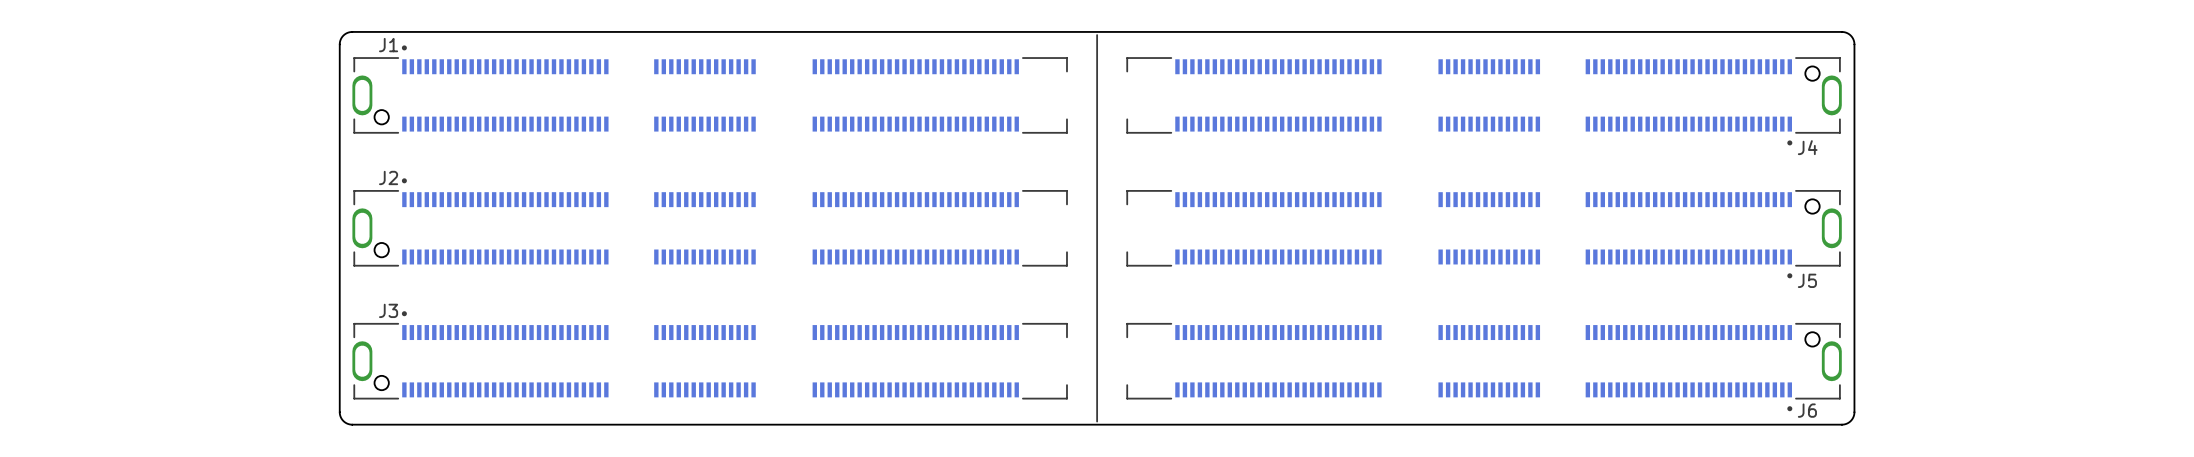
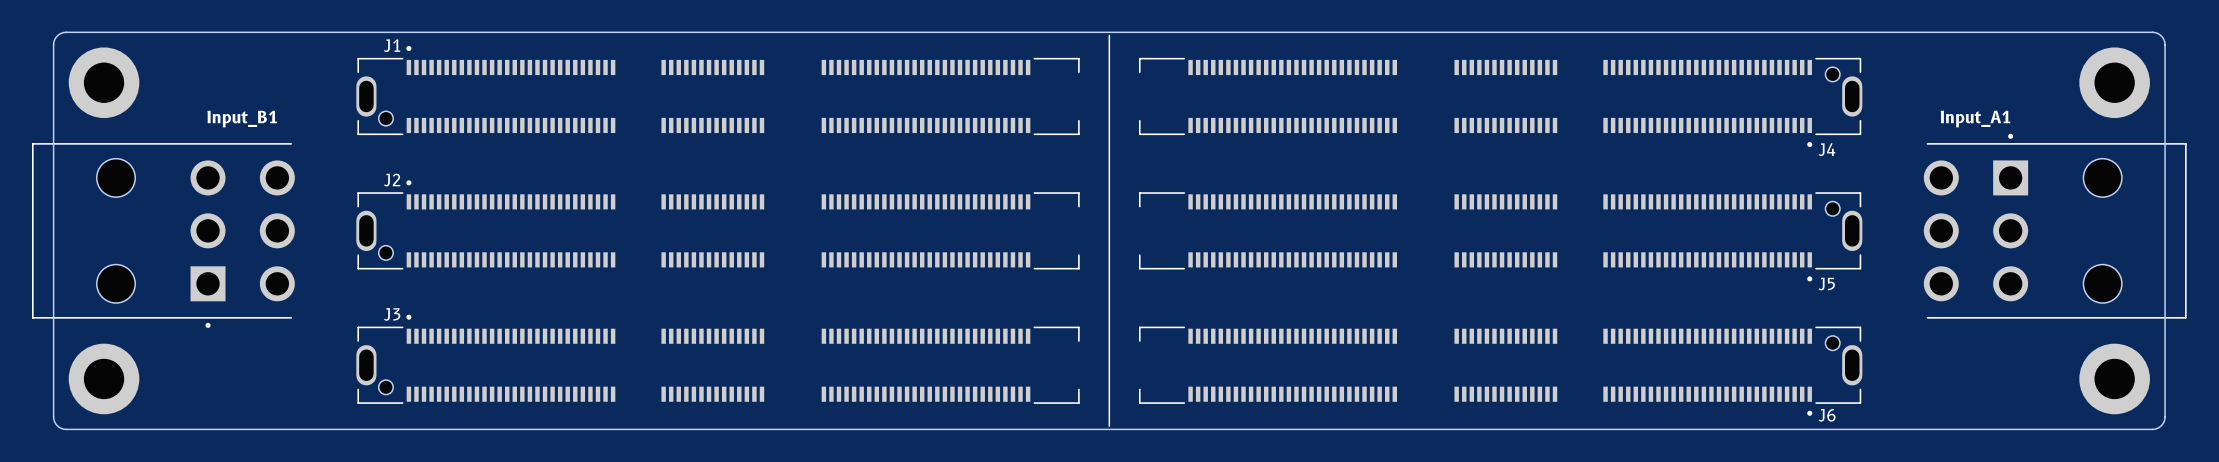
board edge: (352, 31) (343, 35) (339, 44) (339, 412) (343, 421) (352, 424) -> (356, 32) (66, 32) (57, 36) (53, 44) (53, 416) (56, 424) (66, 429) (356, 429)
board edge: (1841, 31) (1850, 35) (1854, 44) (1854, 412) (1850, 421) (1841, 424) -> (1862, 32) (2152, 32) (2161, 36) (2165, 44) (2165, 416) (2162, 424) (2152, 429) (1862, 429)
part: none -> (104, 82)
part: none -> (2114, 82)
Input_A1: none -> (2055, 226)
Input_B1: none -> (163, 235)
part: none -> (104, 378)
part: none -> (2114, 378)

